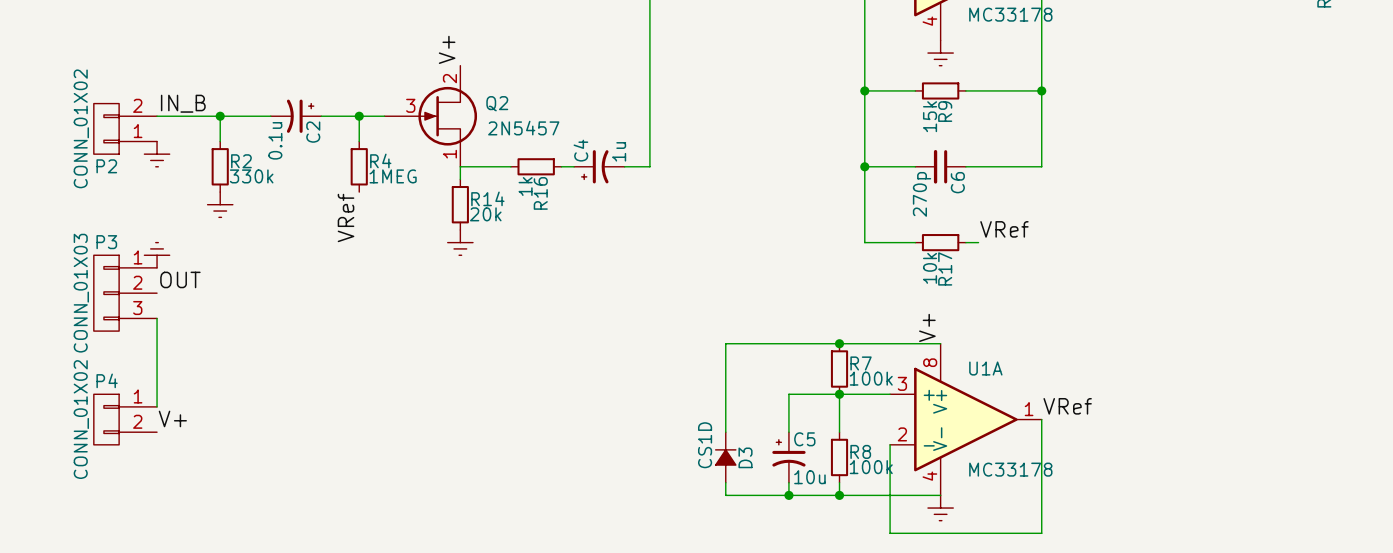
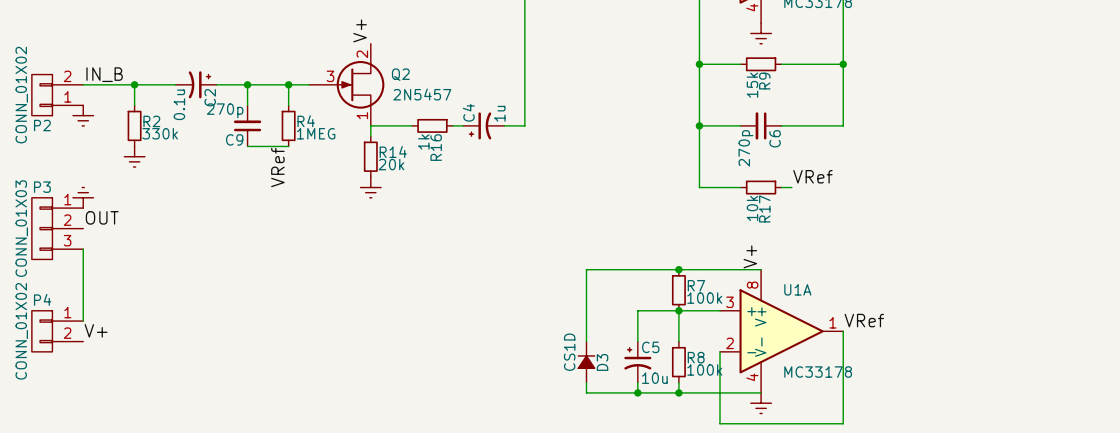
label position: IN_B (183, 103) -> IN_B (104, 74)
wire: none -> (134, 84) (134, 105)
junction: none -> (134, 84)
junction: (220, 116) -> none
C2 position: (296, 116) -> (196, 84)
wire: none -> (247, 84) (247, 105)
junction: none -> (247, 84)
P2 position: (125, 128) -> (57, 95)
power symbol: none -> (83, 115)
power symbol: (157, 154) -> none
R2 position: (220, 166) -> (134, 125)
C9: none -> 270p (247, 125)
wire: none -> (247, 146) (288, 146)
power symbol: none -> (134, 156)
power symbol: (220, 204) -> none
power symbol: none -> (83, 197)
power symbol: (157, 255) -> none
label position: OUT (180, 279) -> OUT (102, 217)
P3 position: (125, 293) -> (57, 228)
wire: (157, 318) (157, 406) -> (83, 249) (83, 321)
label position: V+ (172, 418) -> V+ (96, 330)
P4 position: (125, 419) -> (57, 331)

